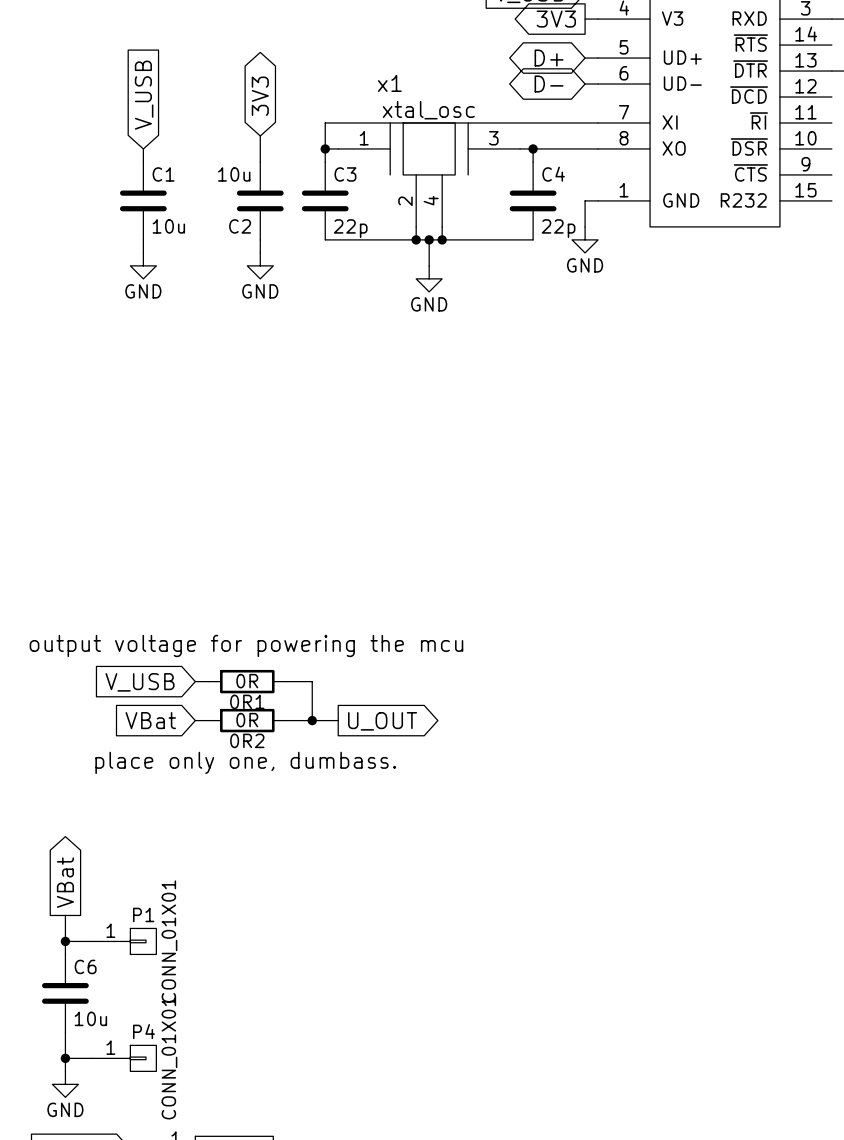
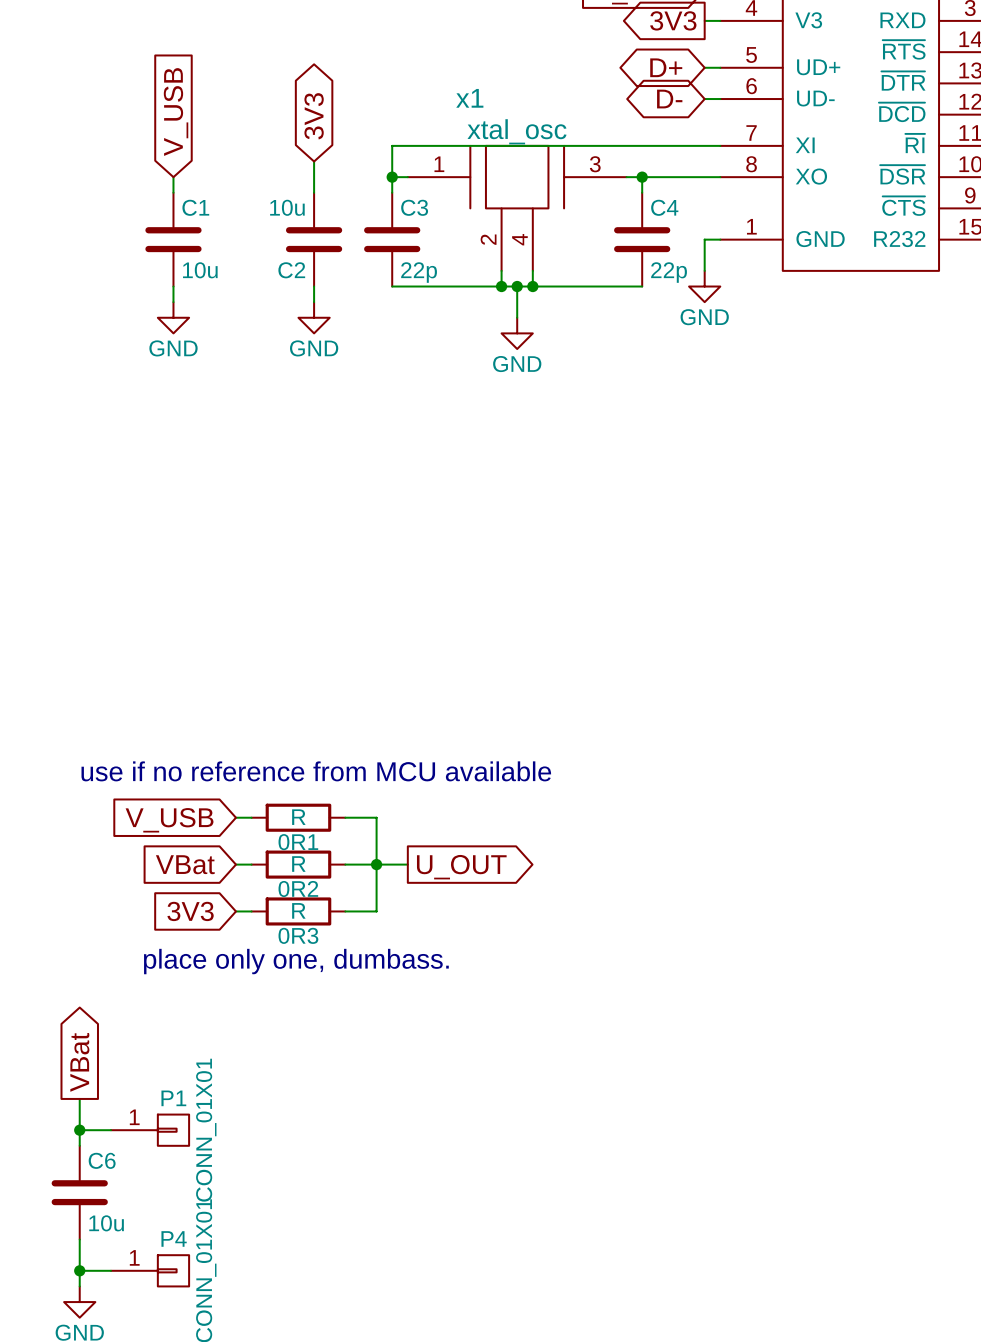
text: none -> use if no reference from MCU available (316, 771)
text: output voltage for powering the mcu (246, 645) -> none
0R1 value: 0R (247, 681) -> R (298, 817)
0R2 value: 0R (247, 720) -> R (298, 864)
wire: none -> (376, 864) (376, 911) (345, 911)
global label: none -> 3V3 (190, 911)
wire: none -> (235, 911) (251, 911)
0R3: none -> R (298, 911)
text position: place only one, dumbass. (245, 762) -> place only one, dumbass. (296, 961)

